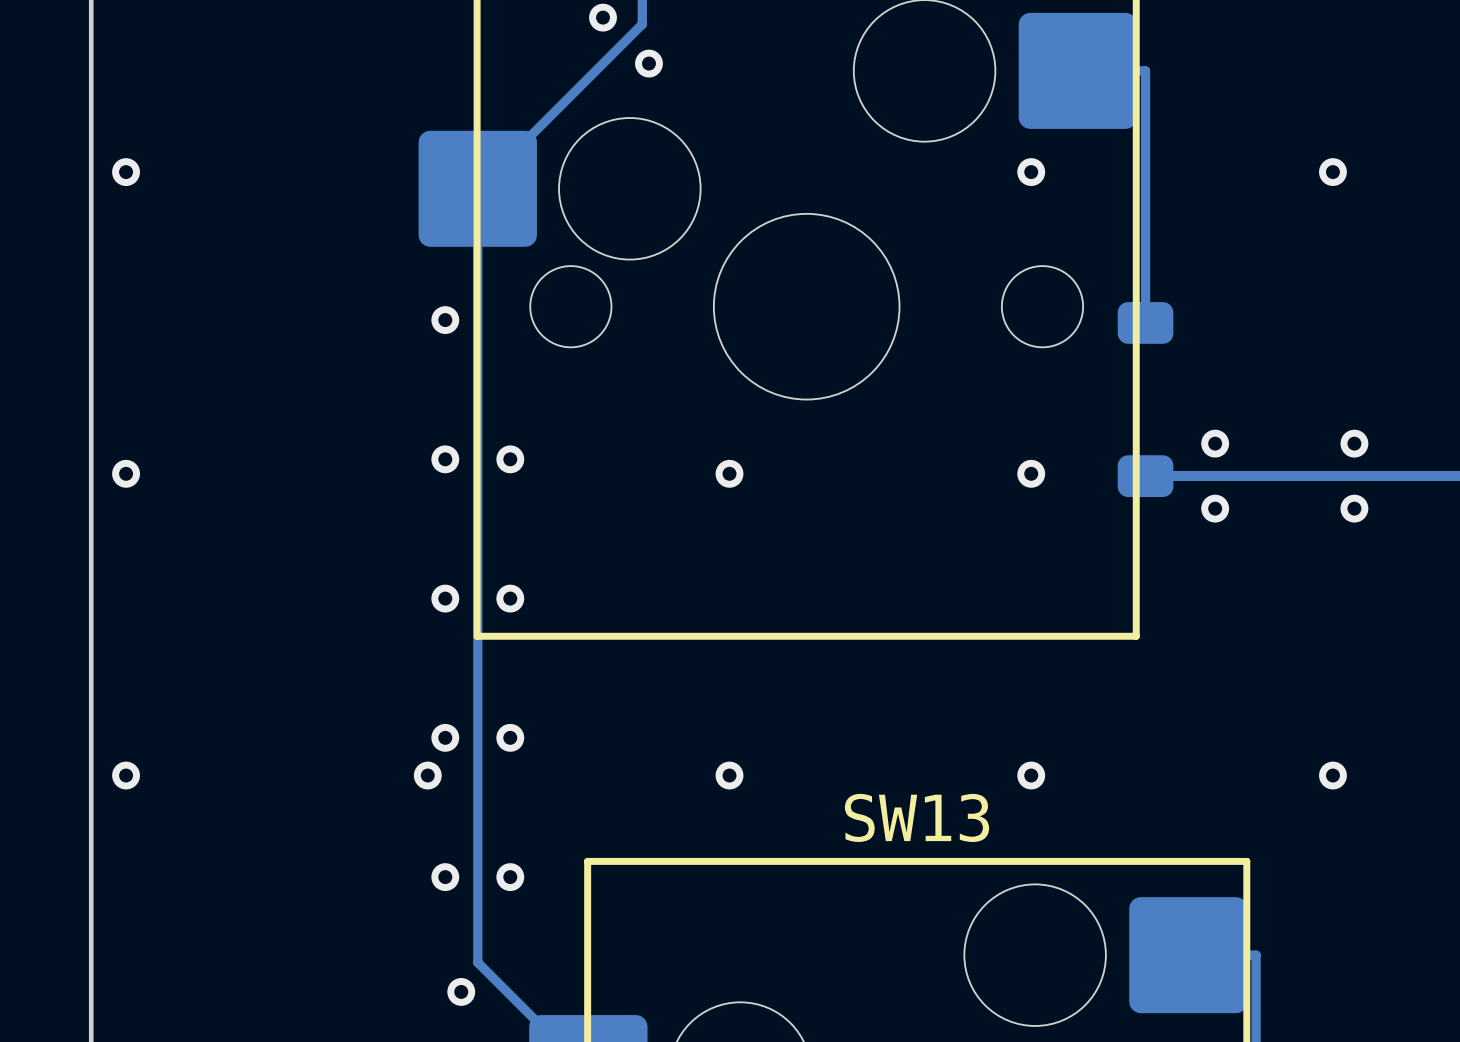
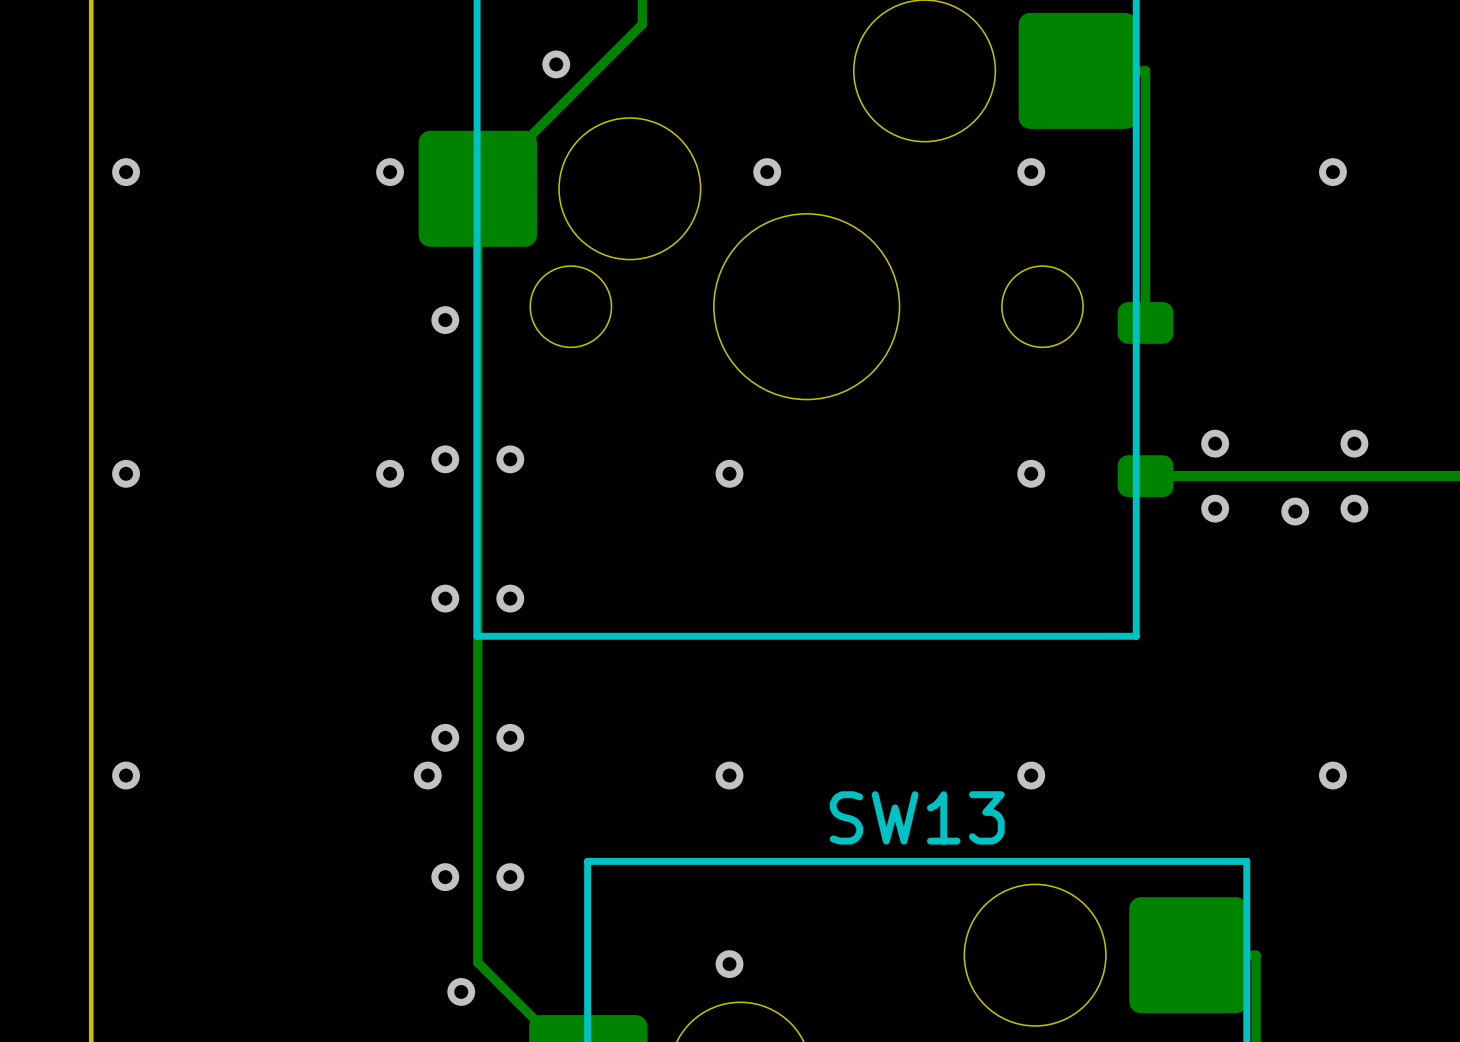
via: (603, 17) -> none
via: (648, 63) -> none
via: none -> (556, 64)
via: none -> (390, 172)
via: none -> (767, 172)
via: none -> (390, 473)
via: none -> (1295, 511)
via: none -> (729, 964)

